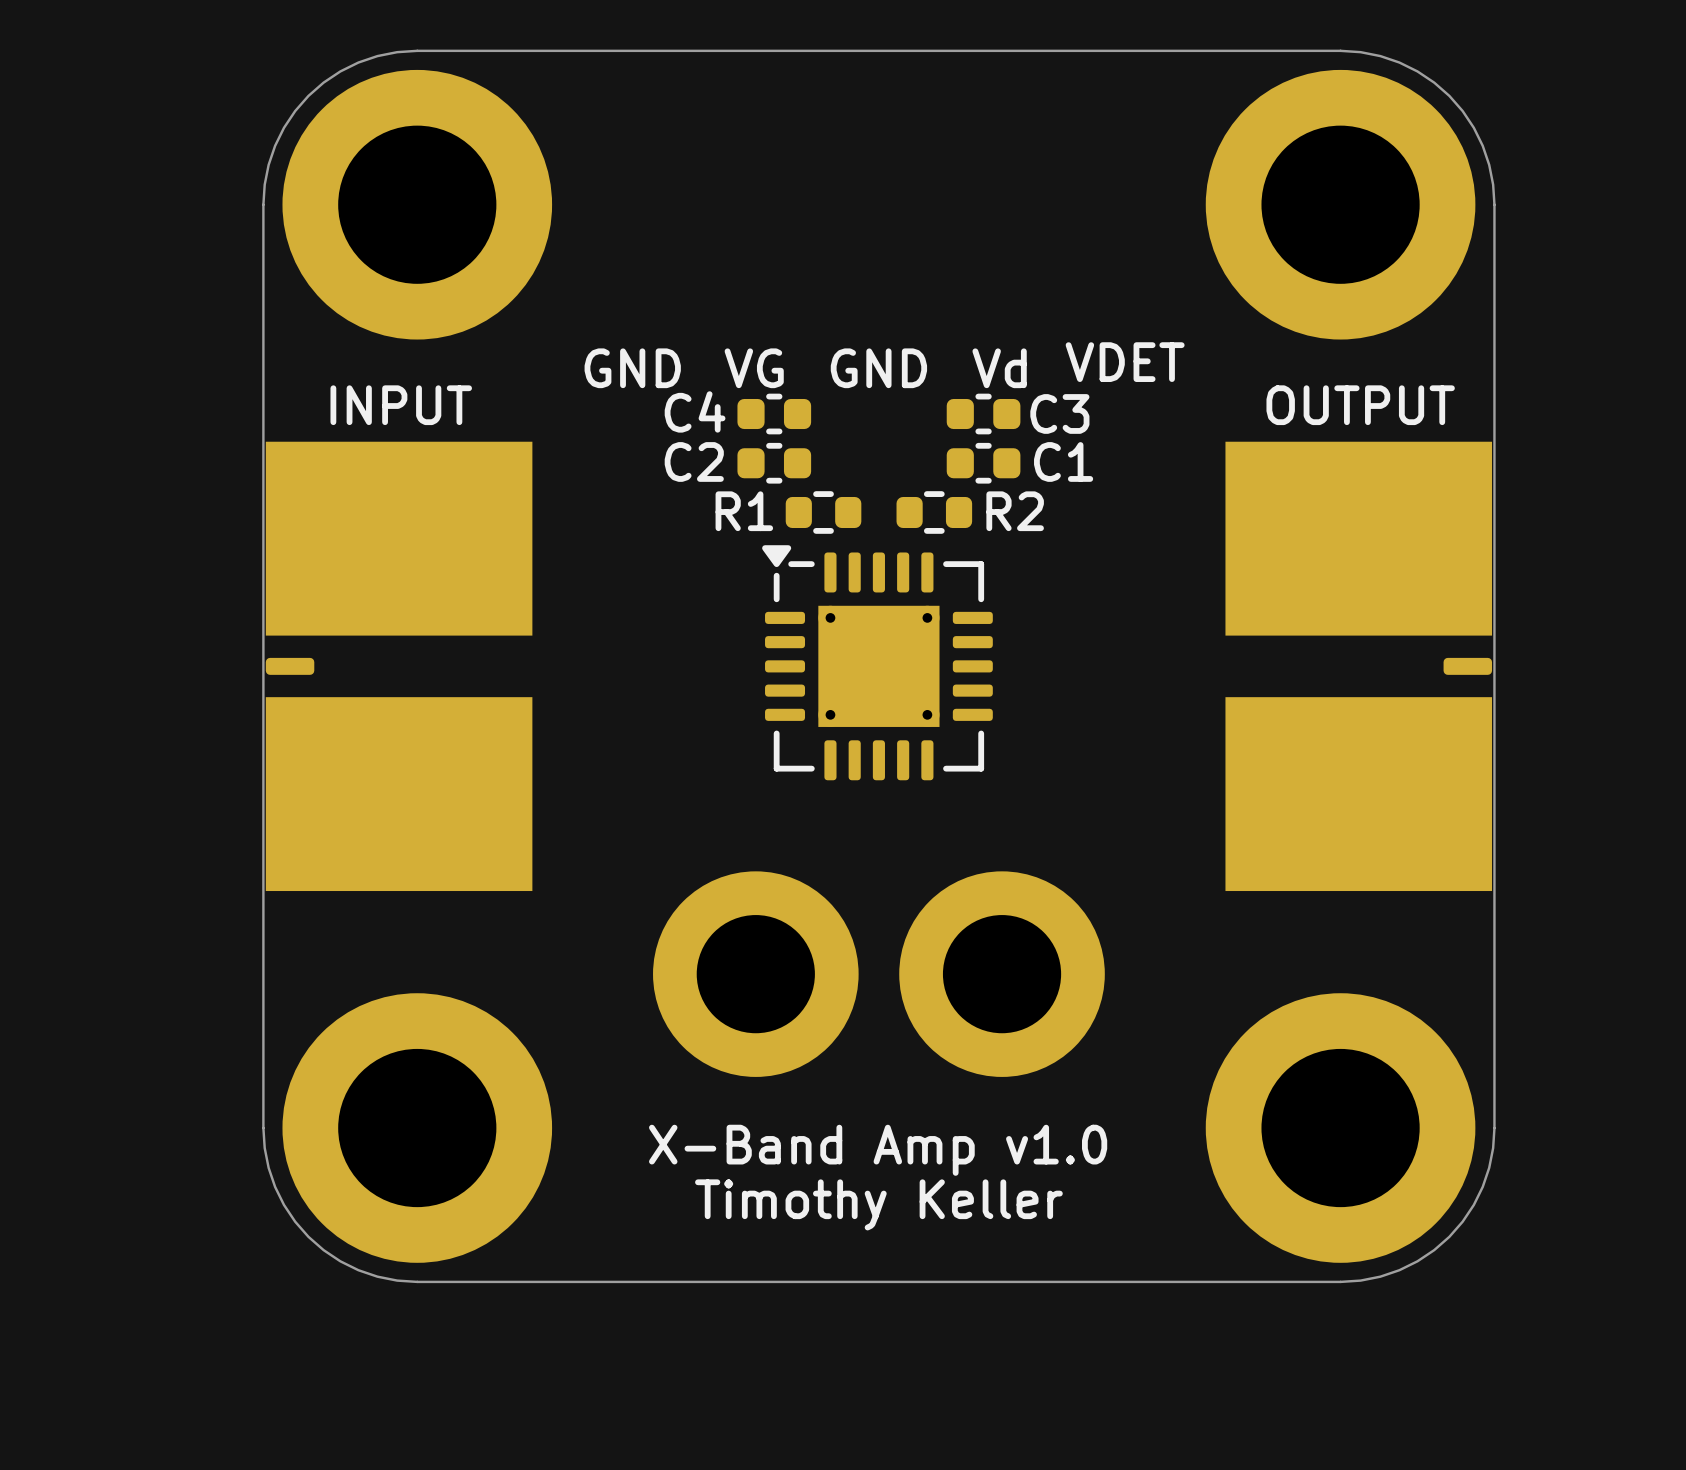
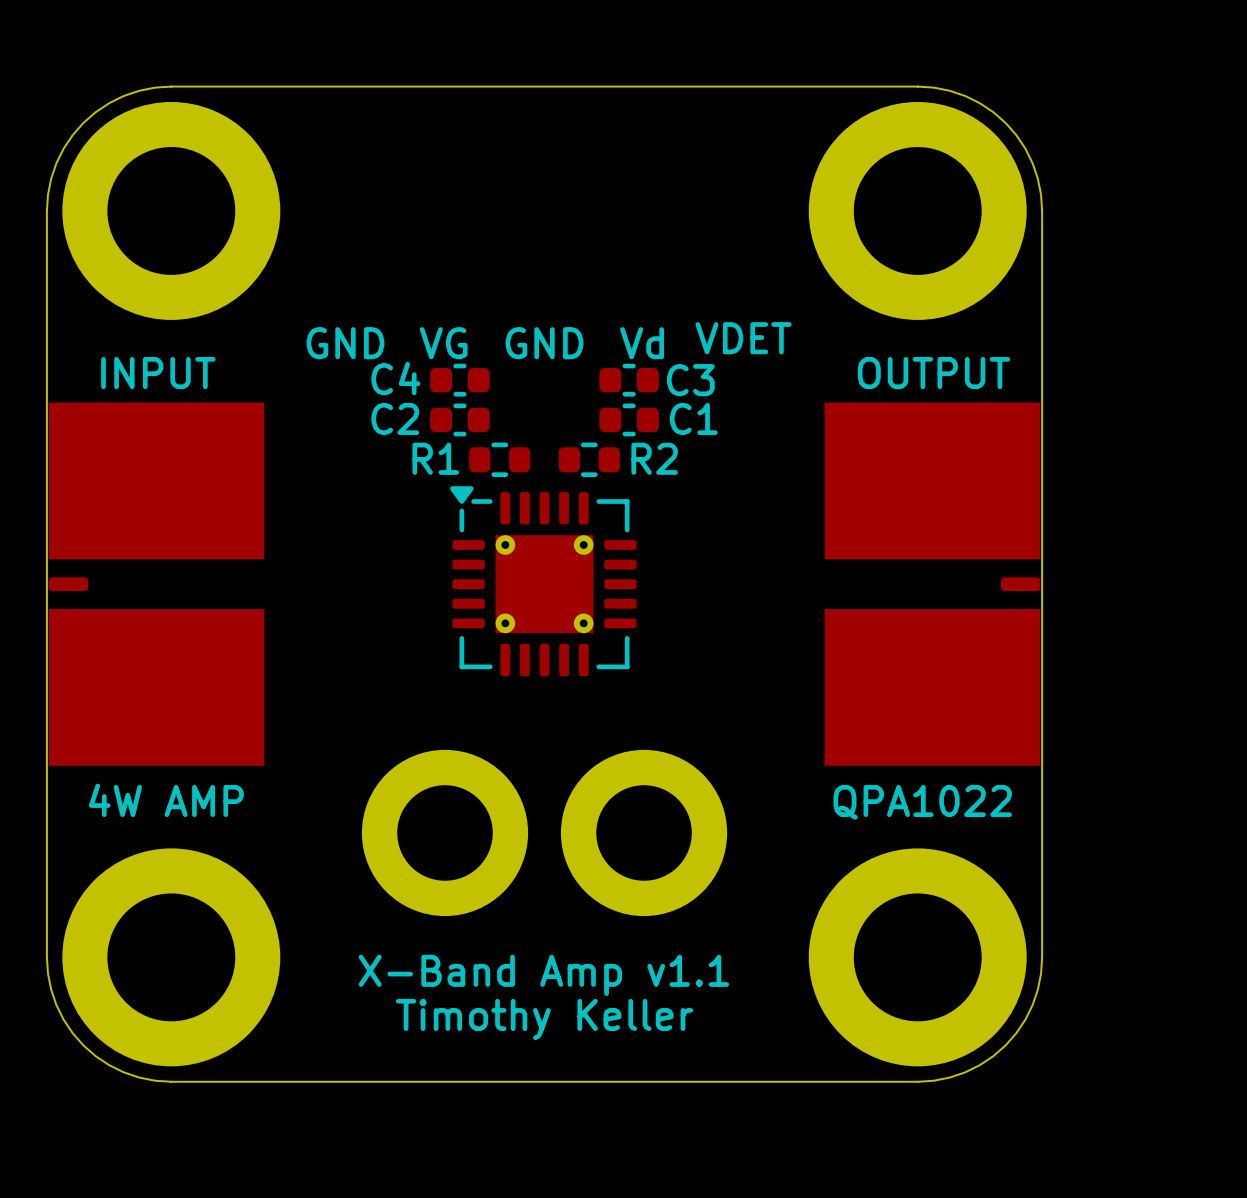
text: none -> 4W AMP (166, 800)
text: none -> QPA1022 (922, 802)
text: X-Band Amp v1.0 (878, 1150) -> X-Band Amp v1.1 (543, 975)

